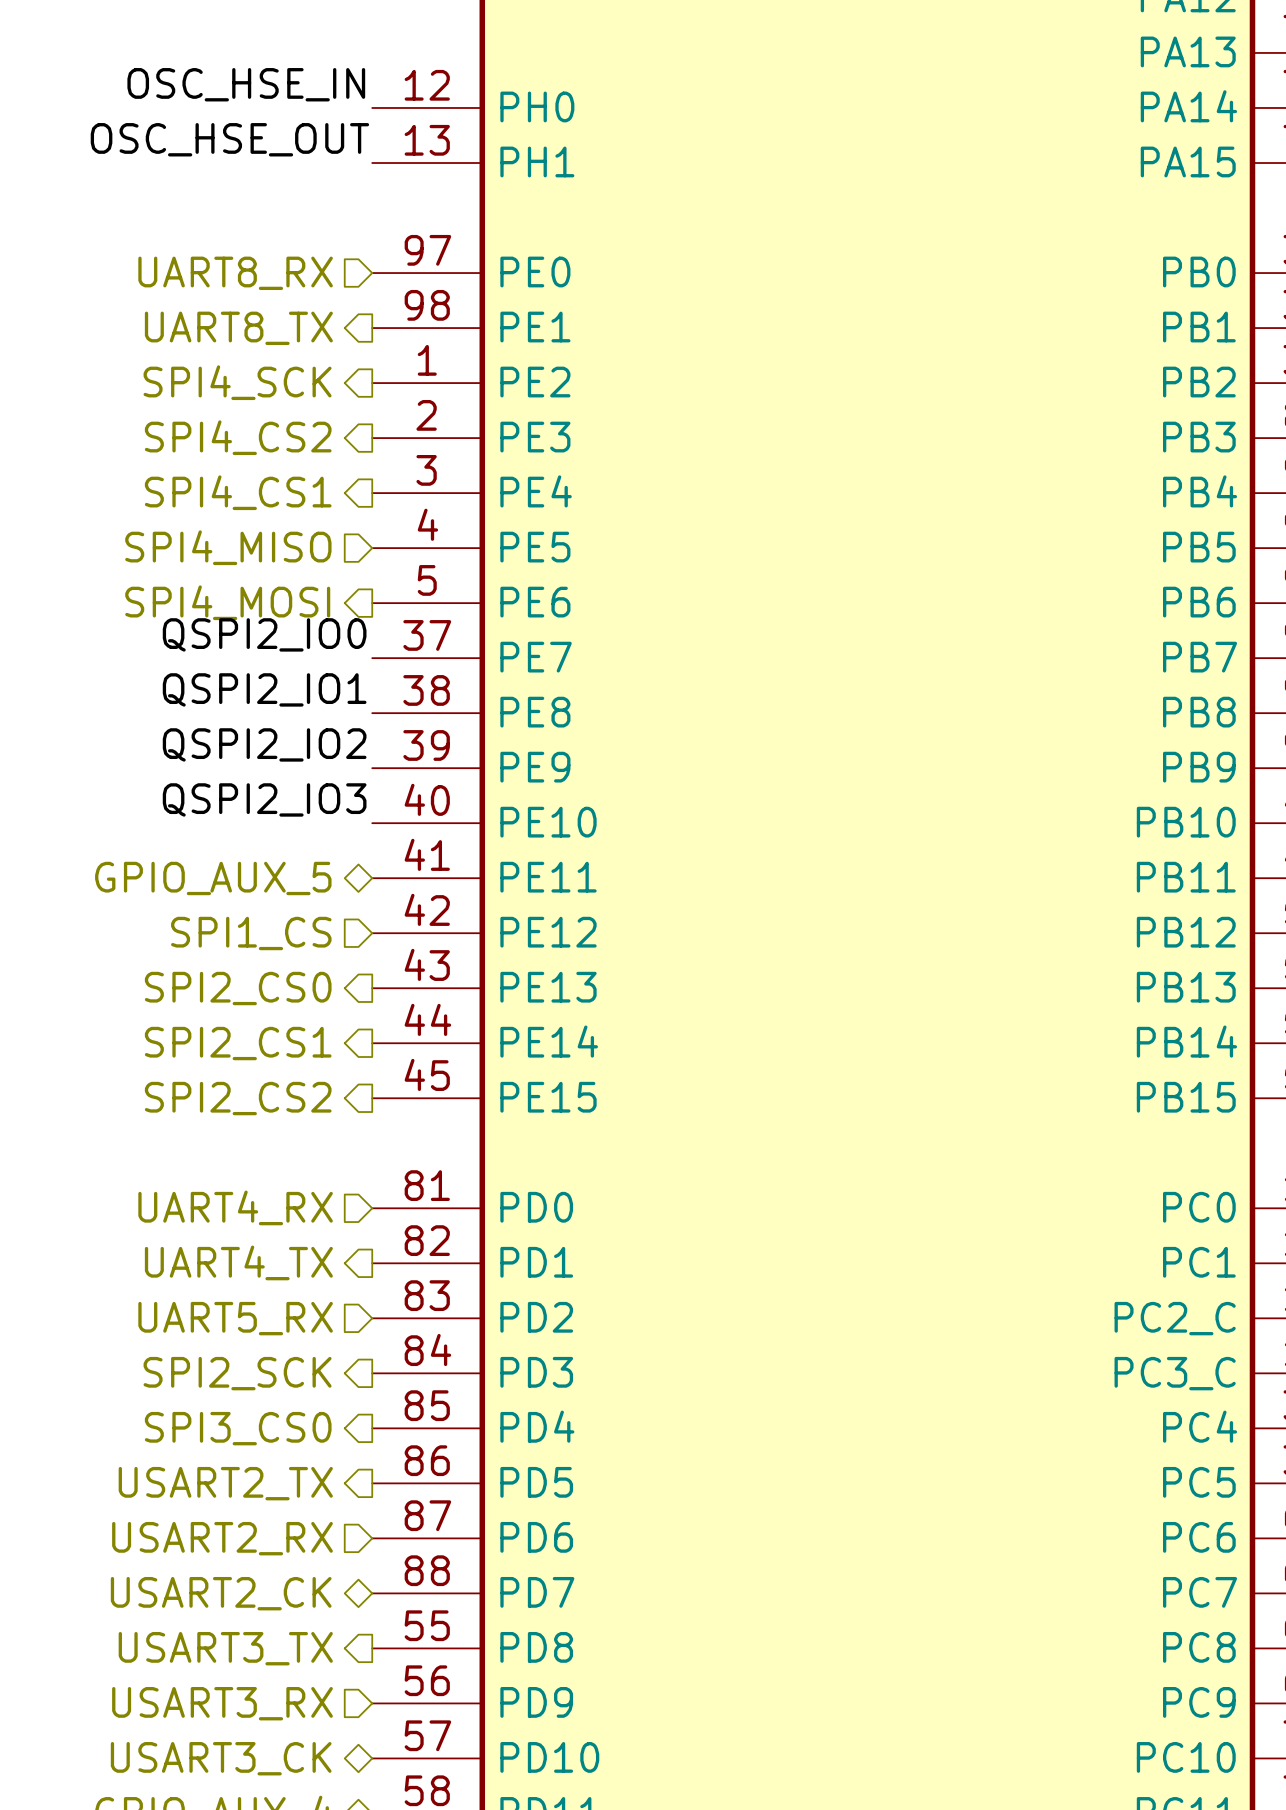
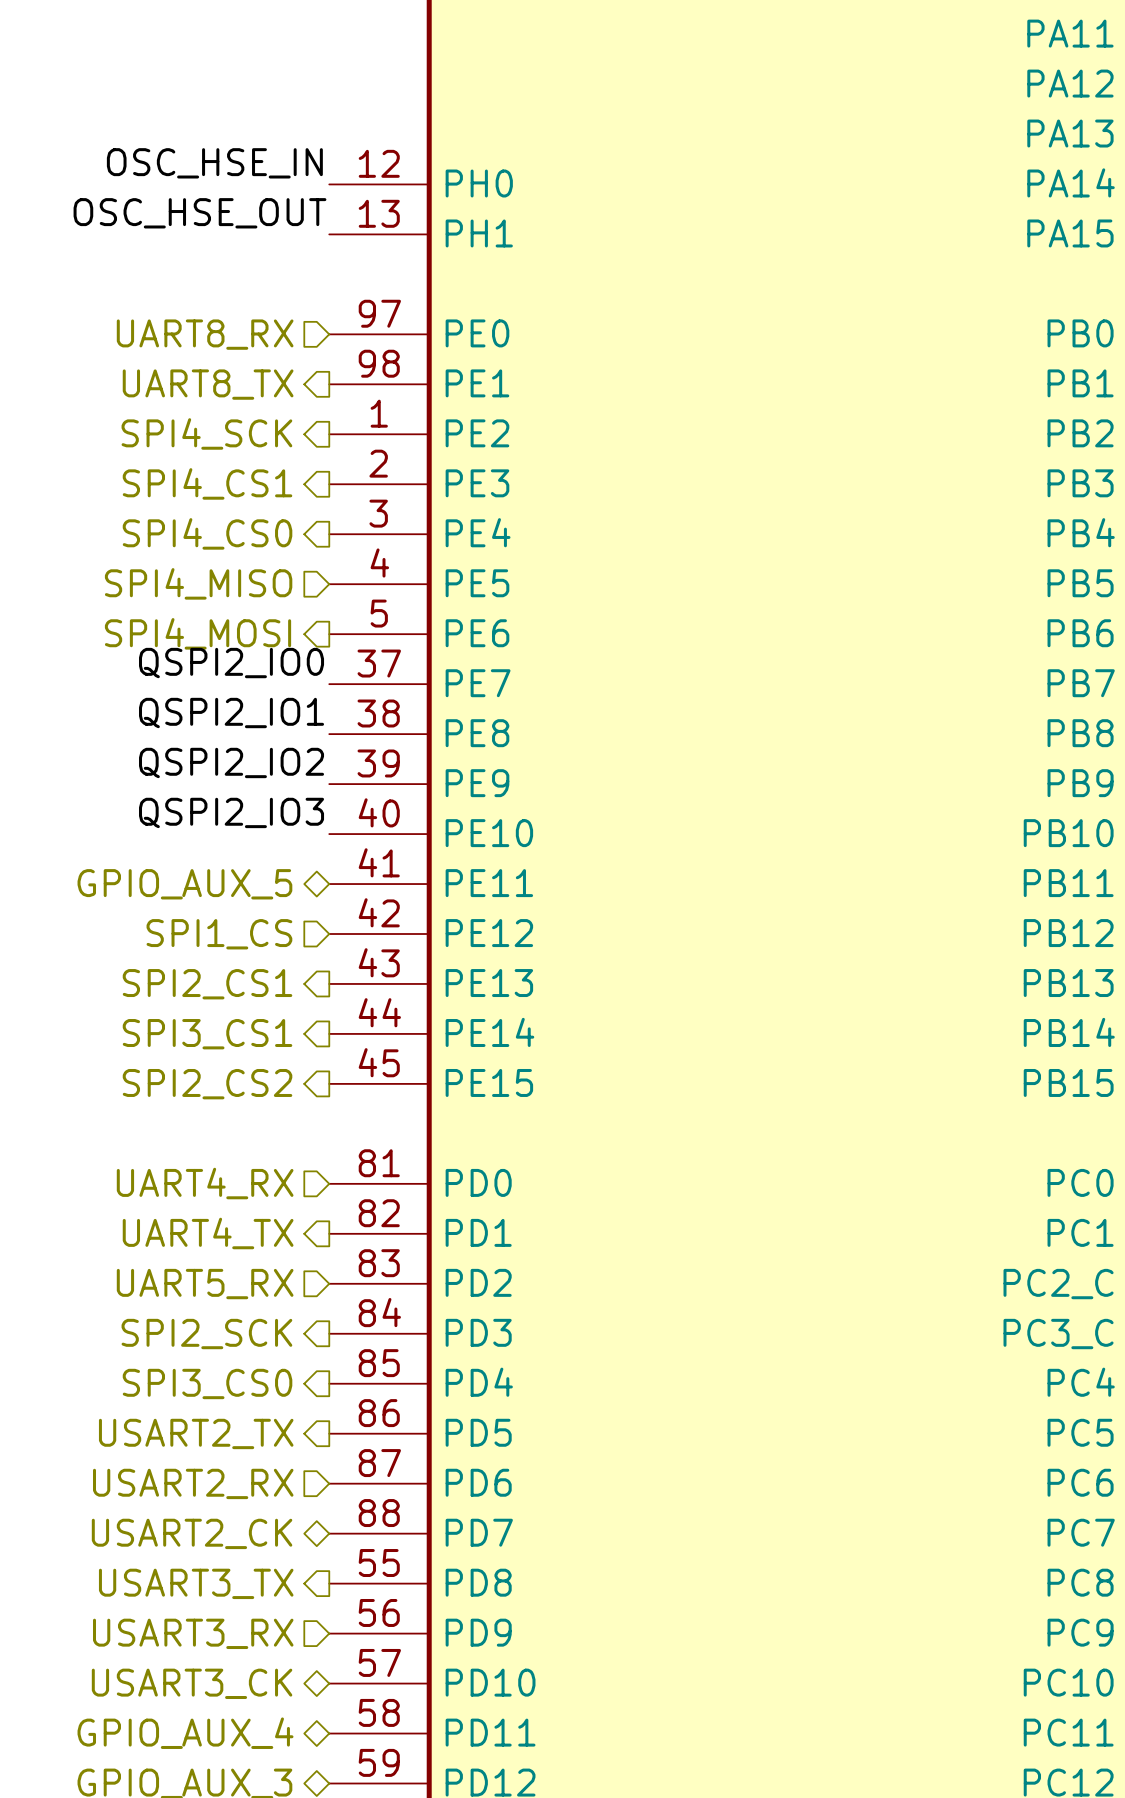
hierarchical label: SPI4_CS2 (238, 437) -> SPI4_CS1 (207, 483)
hierarchical label: SPI4_CS1 (238, 492) -> SPI4_CS0 (207, 533)
hierarchical label: SPI2_CS0 (238, 988) -> SPI2_CS1 (207, 984)
hierarchical label: SPI2_CS1 (238, 1043) -> SPI3_CS1 (207, 1034)

